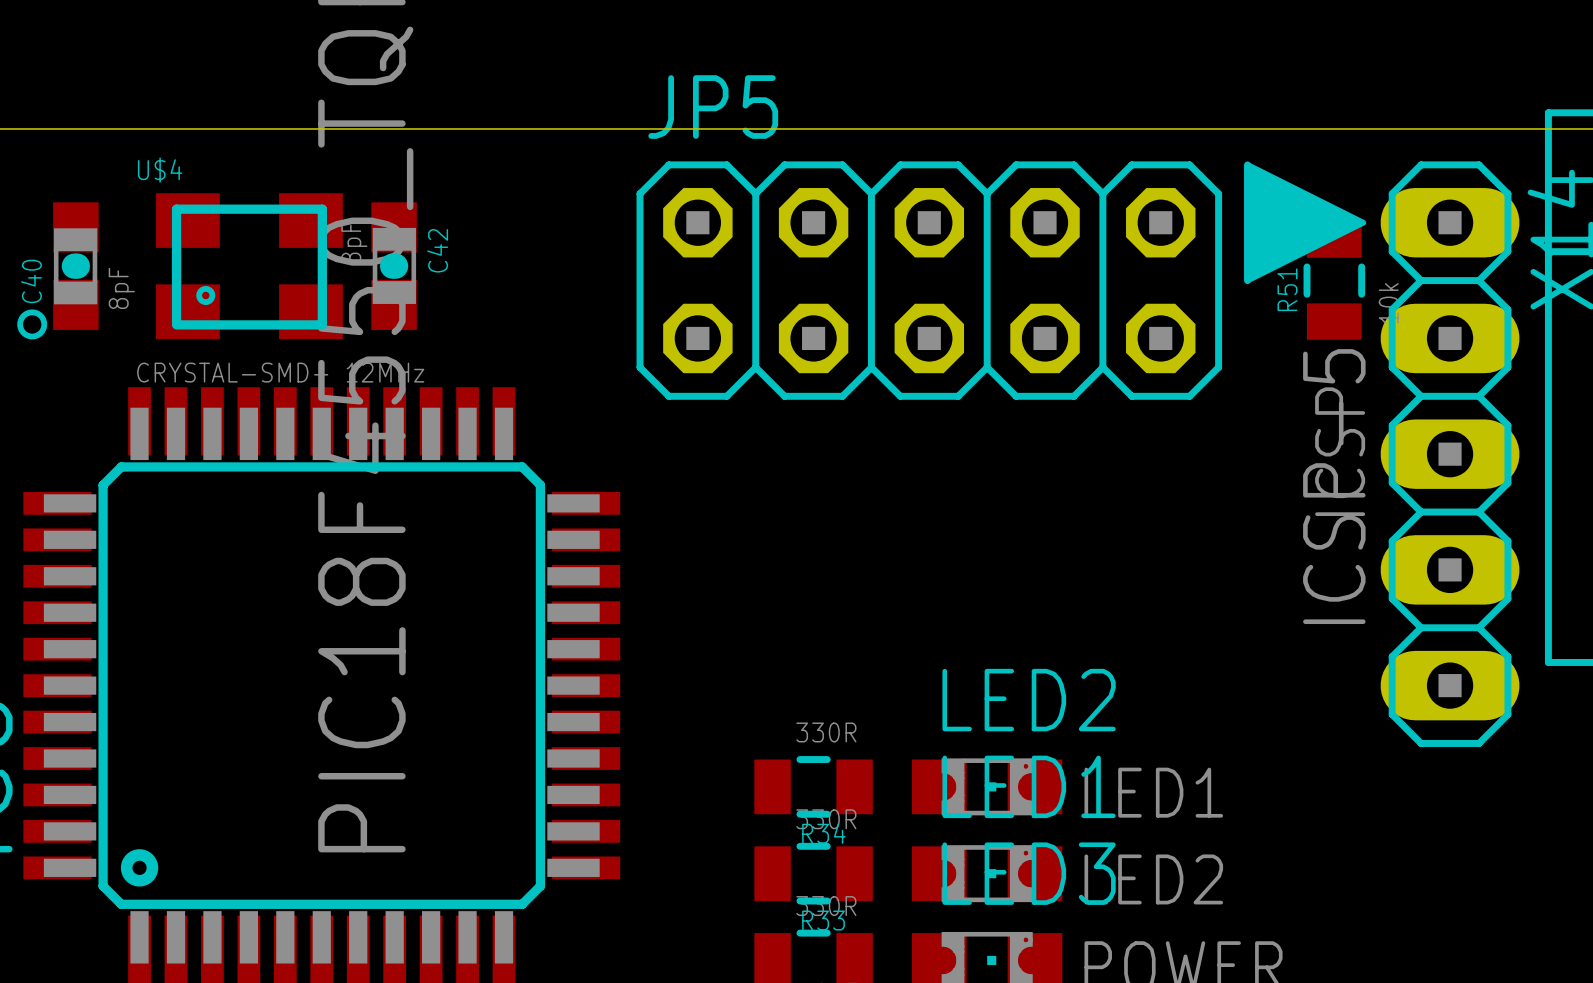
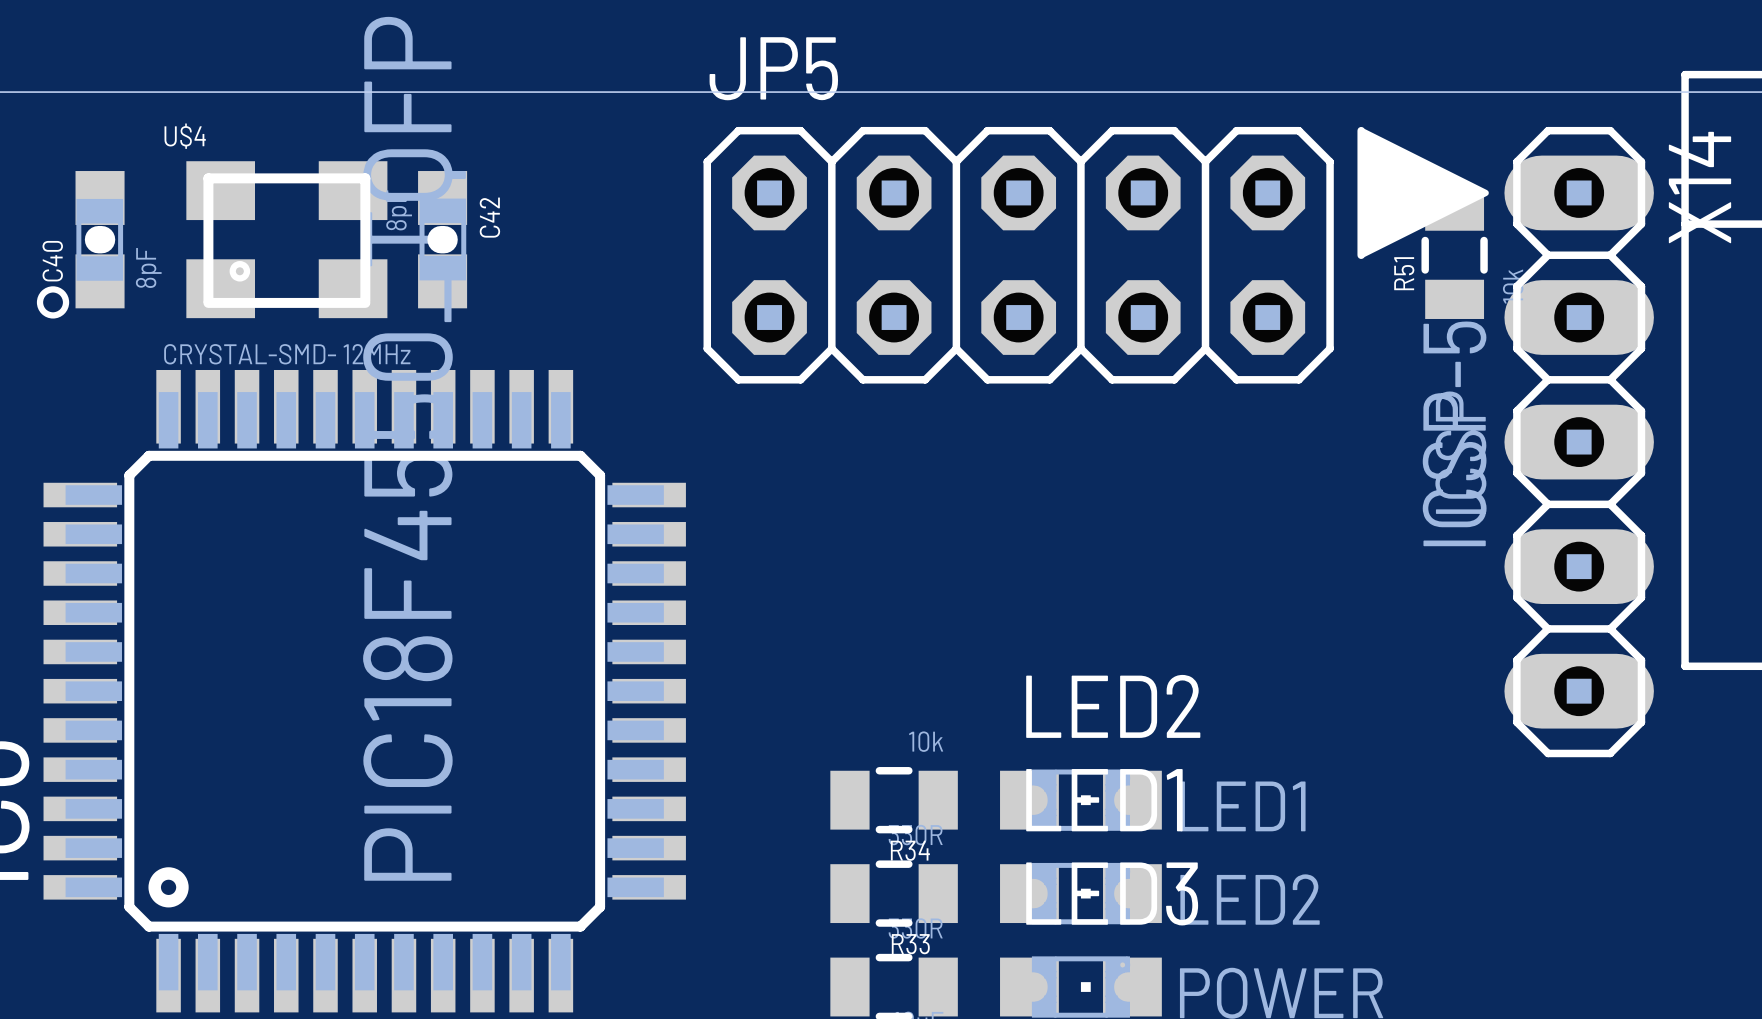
R34 value: 330R (826, 732) -> 10k (926, 741)

